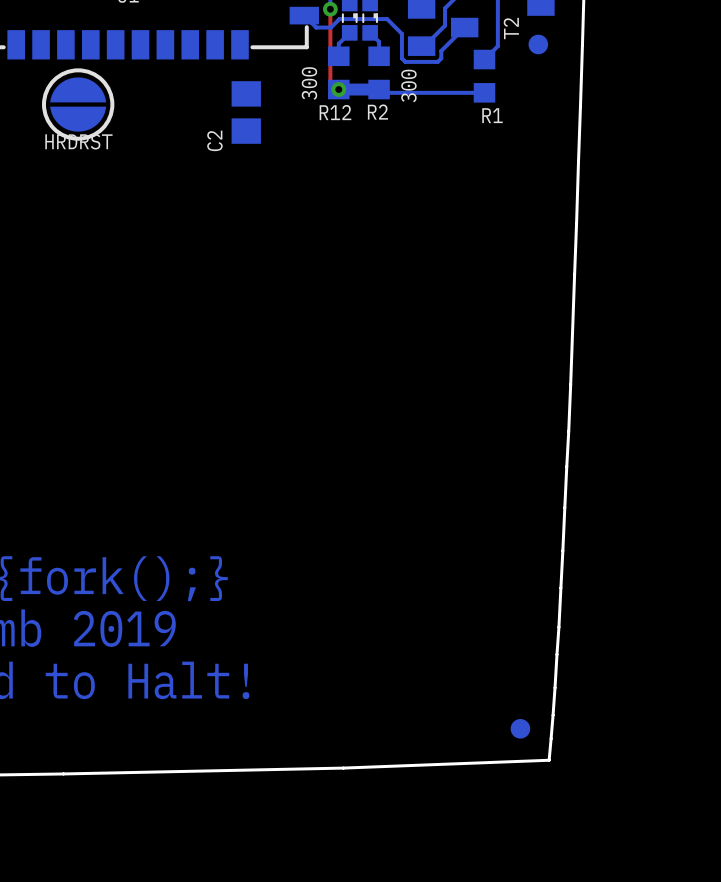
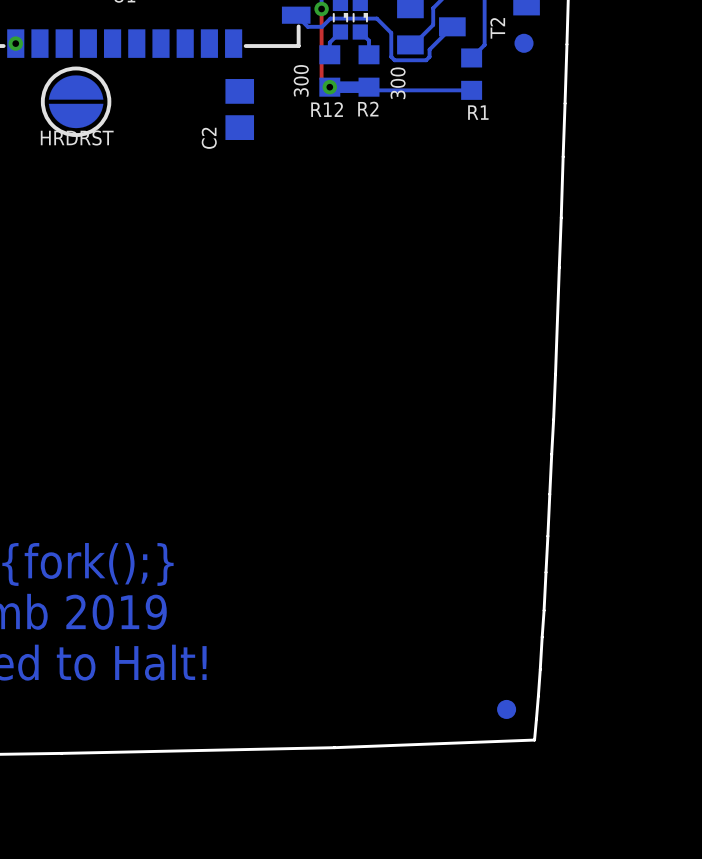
via: none -> (15, 43)

